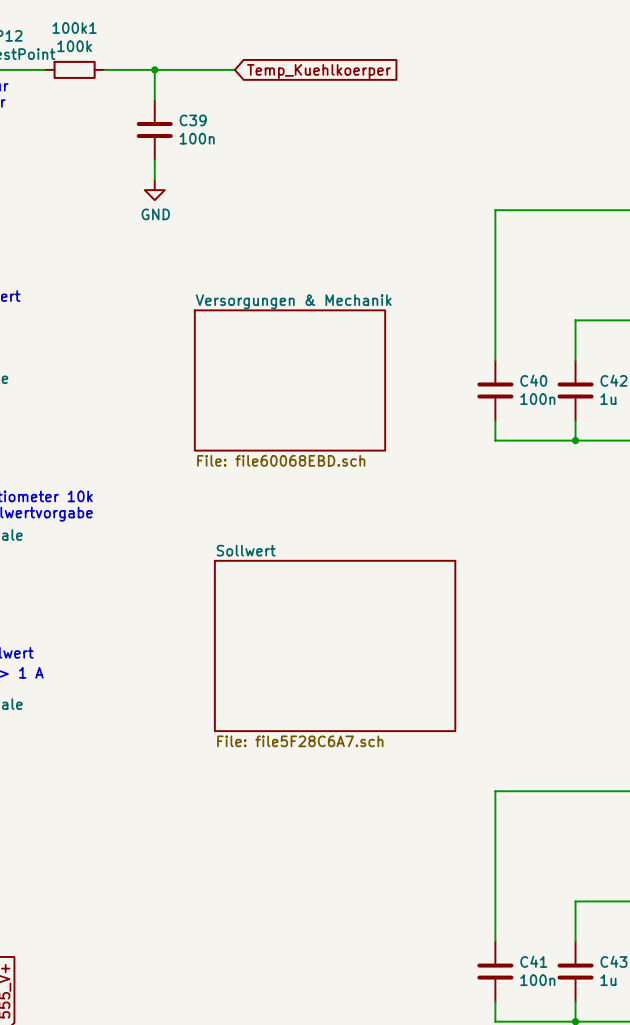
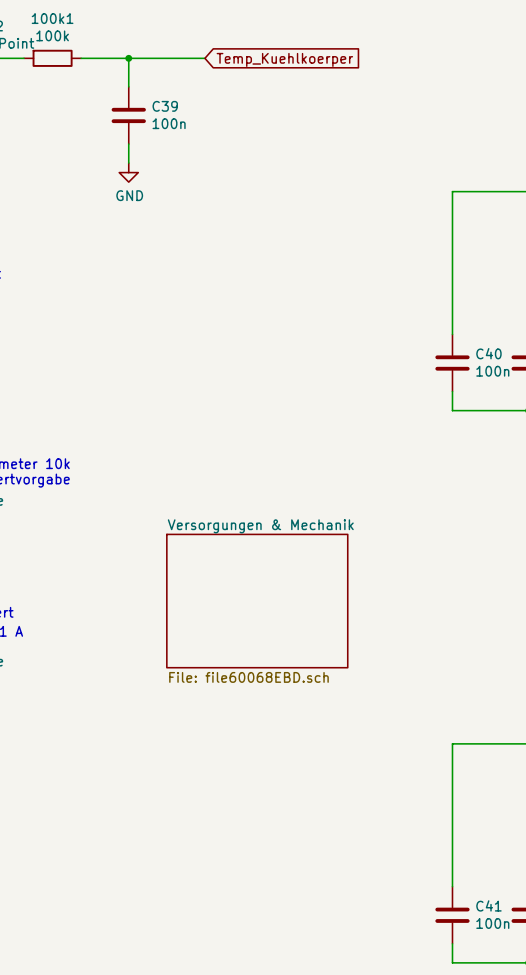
sheet Versorgungen & Mechanik: File: file60068EBD.sch (290, 380) -> none
sheet Versorgungen & Mechanik: none -> File: file60068EBD.sch (257, 601)
sheet Sollwert: File: file5F28C6A7.sch (335, 645) -> none

